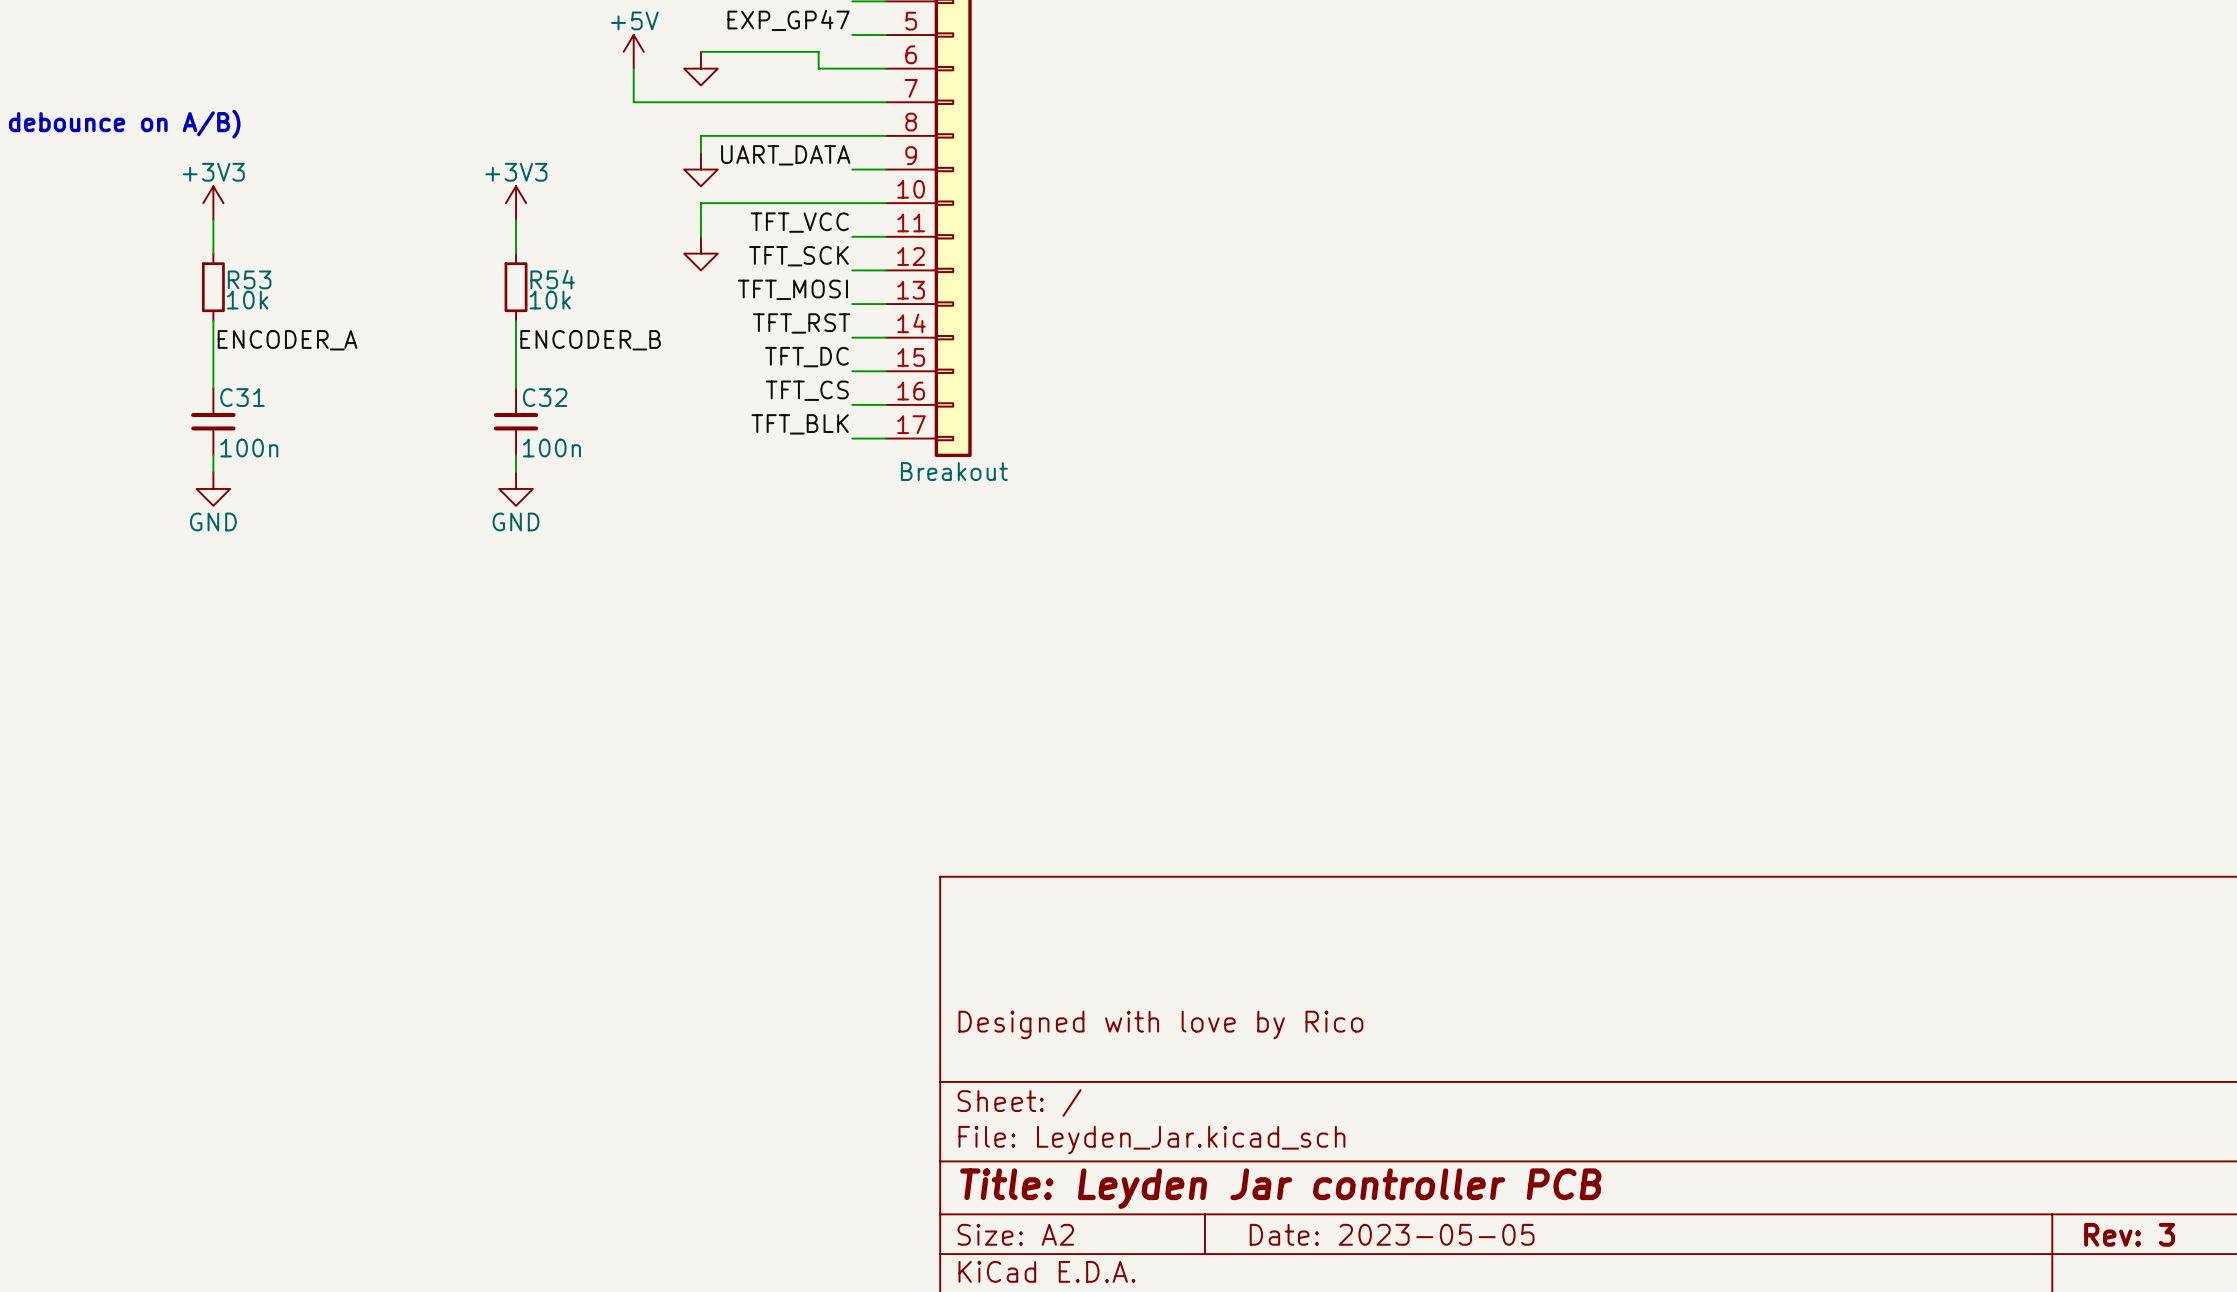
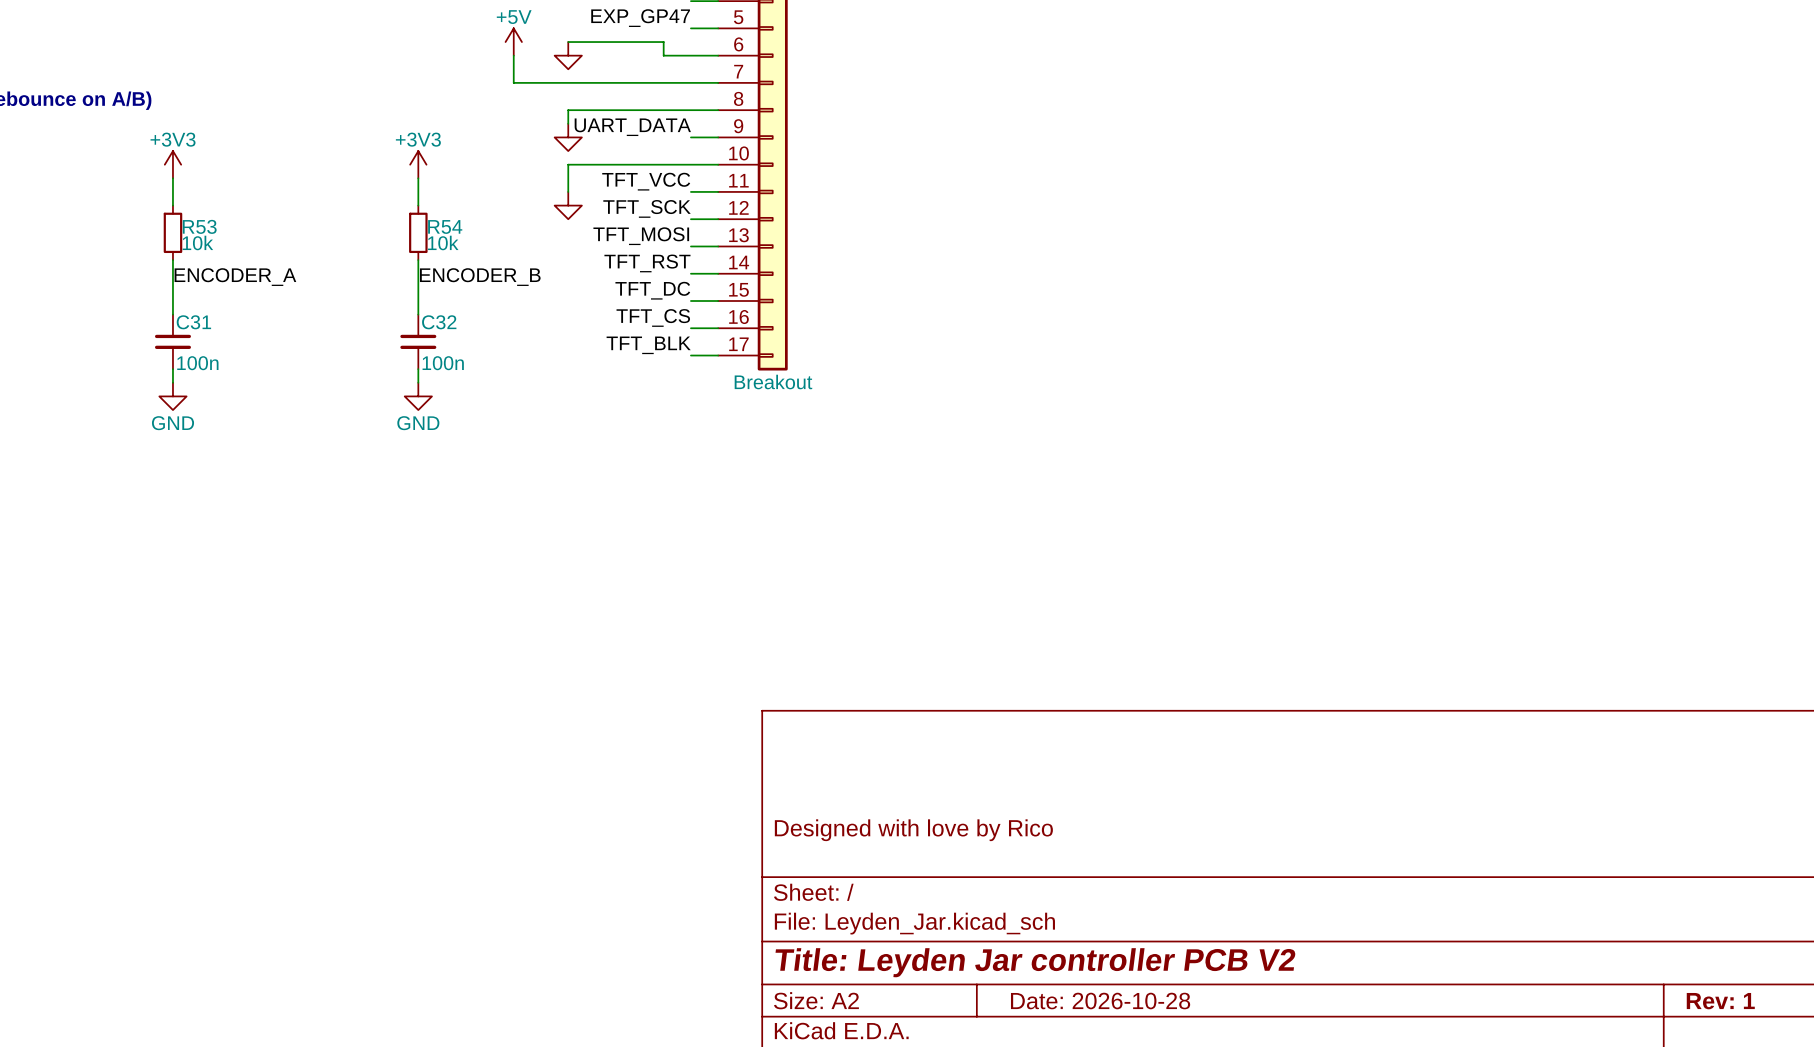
title block: Title: Leyden Jar controller PCB (1280, 1188) -> Title: Leyden Jar controller PCB V2 (1035, 962)
title block: Date: 2023-05-05 (1392, 1234) -> Date: 2026-10-28 (1100, 1001)
title block: Rev: 3 (2129, 1234) -> Rev: 1 (1720, 1001)

